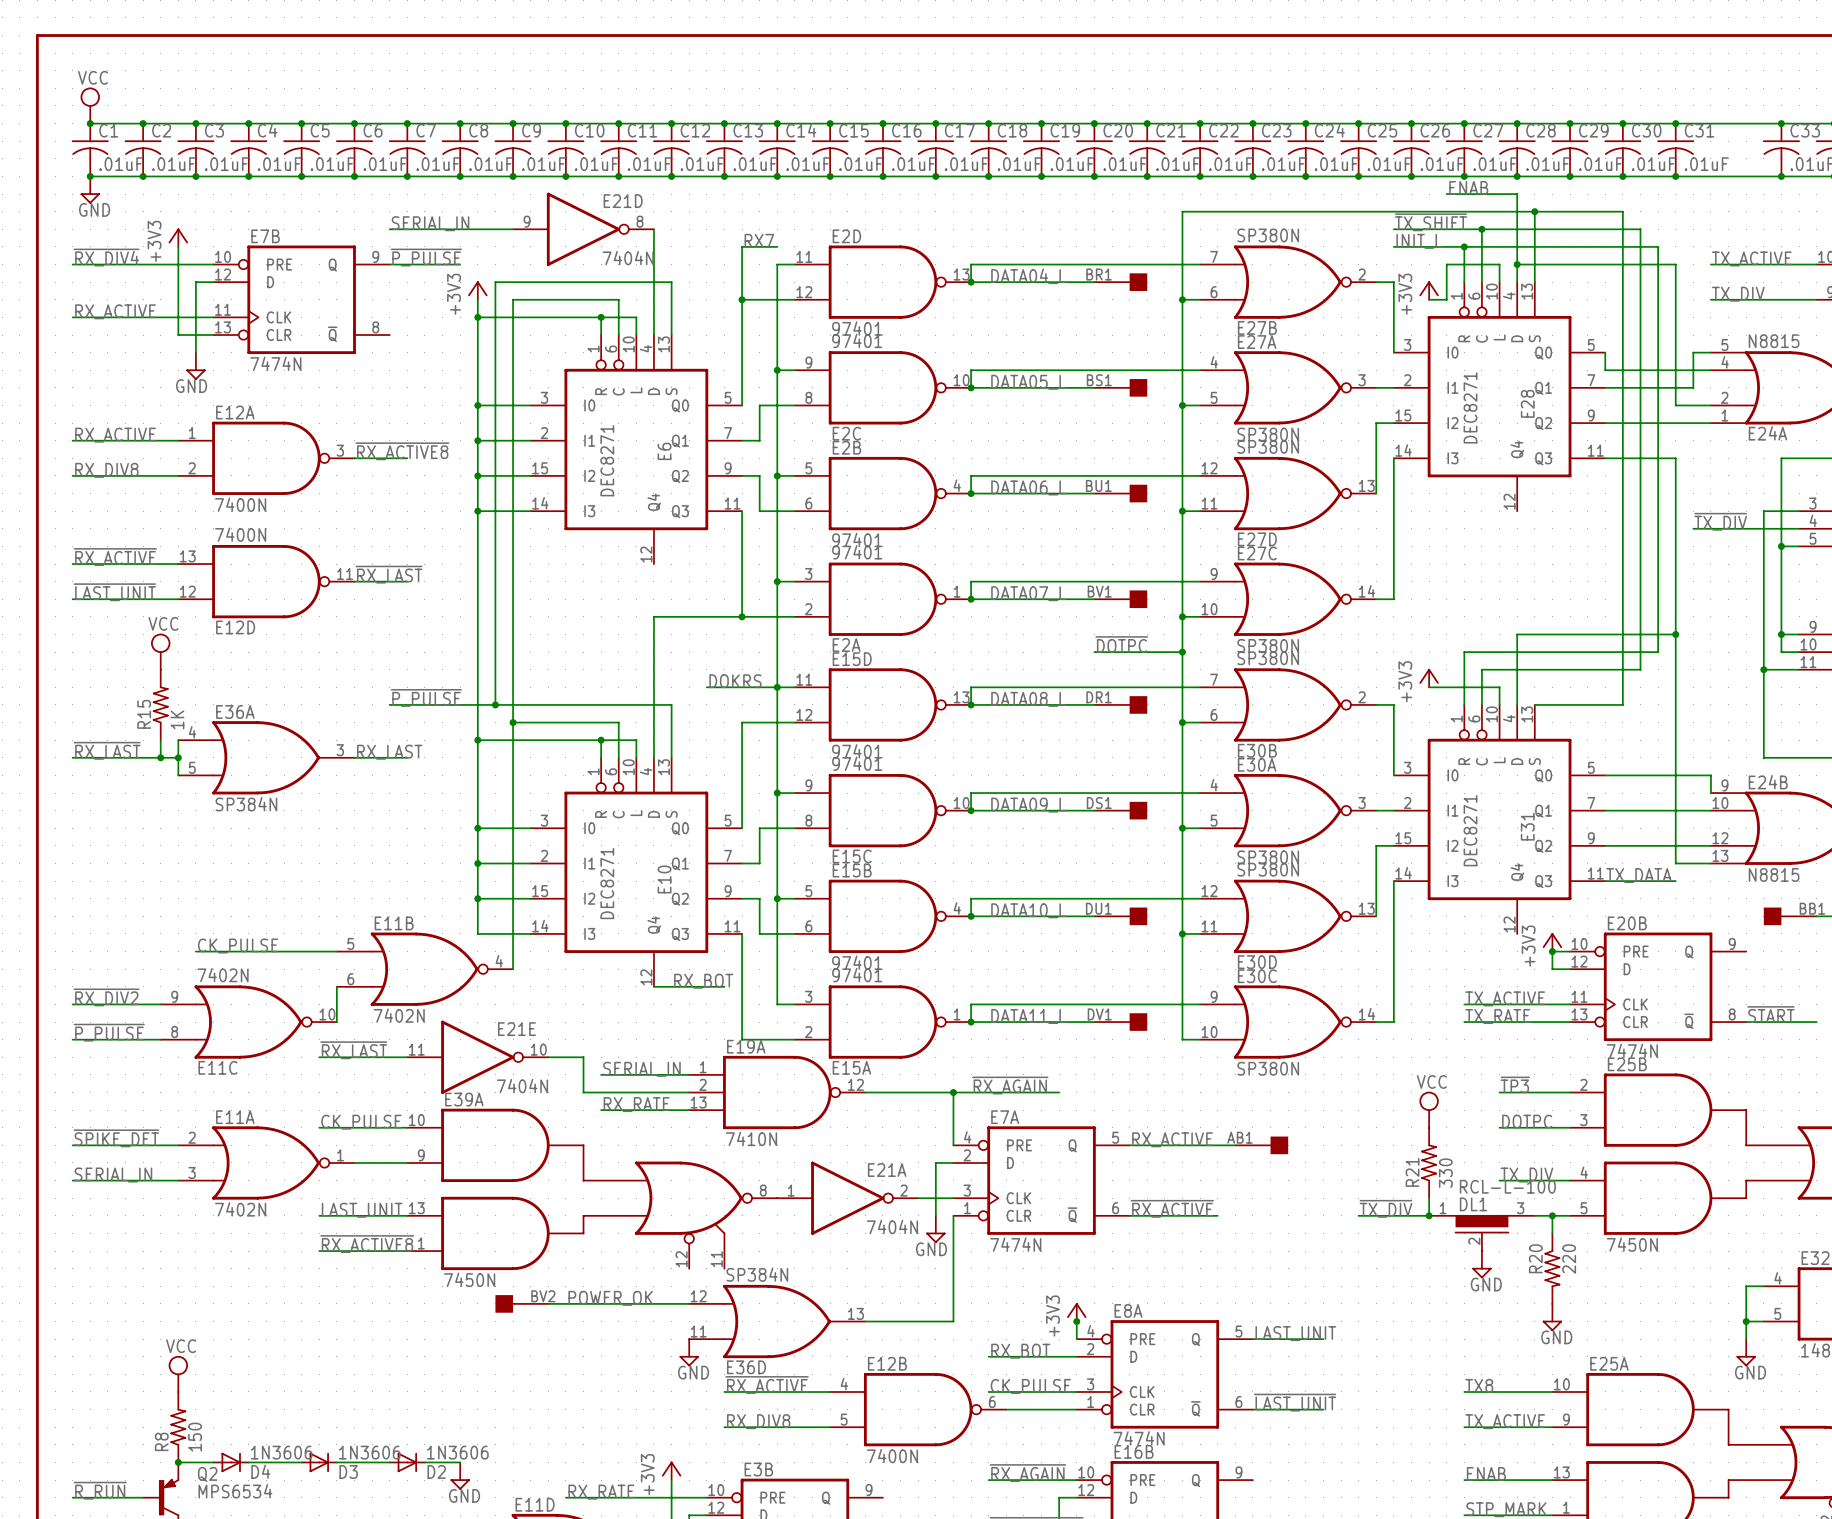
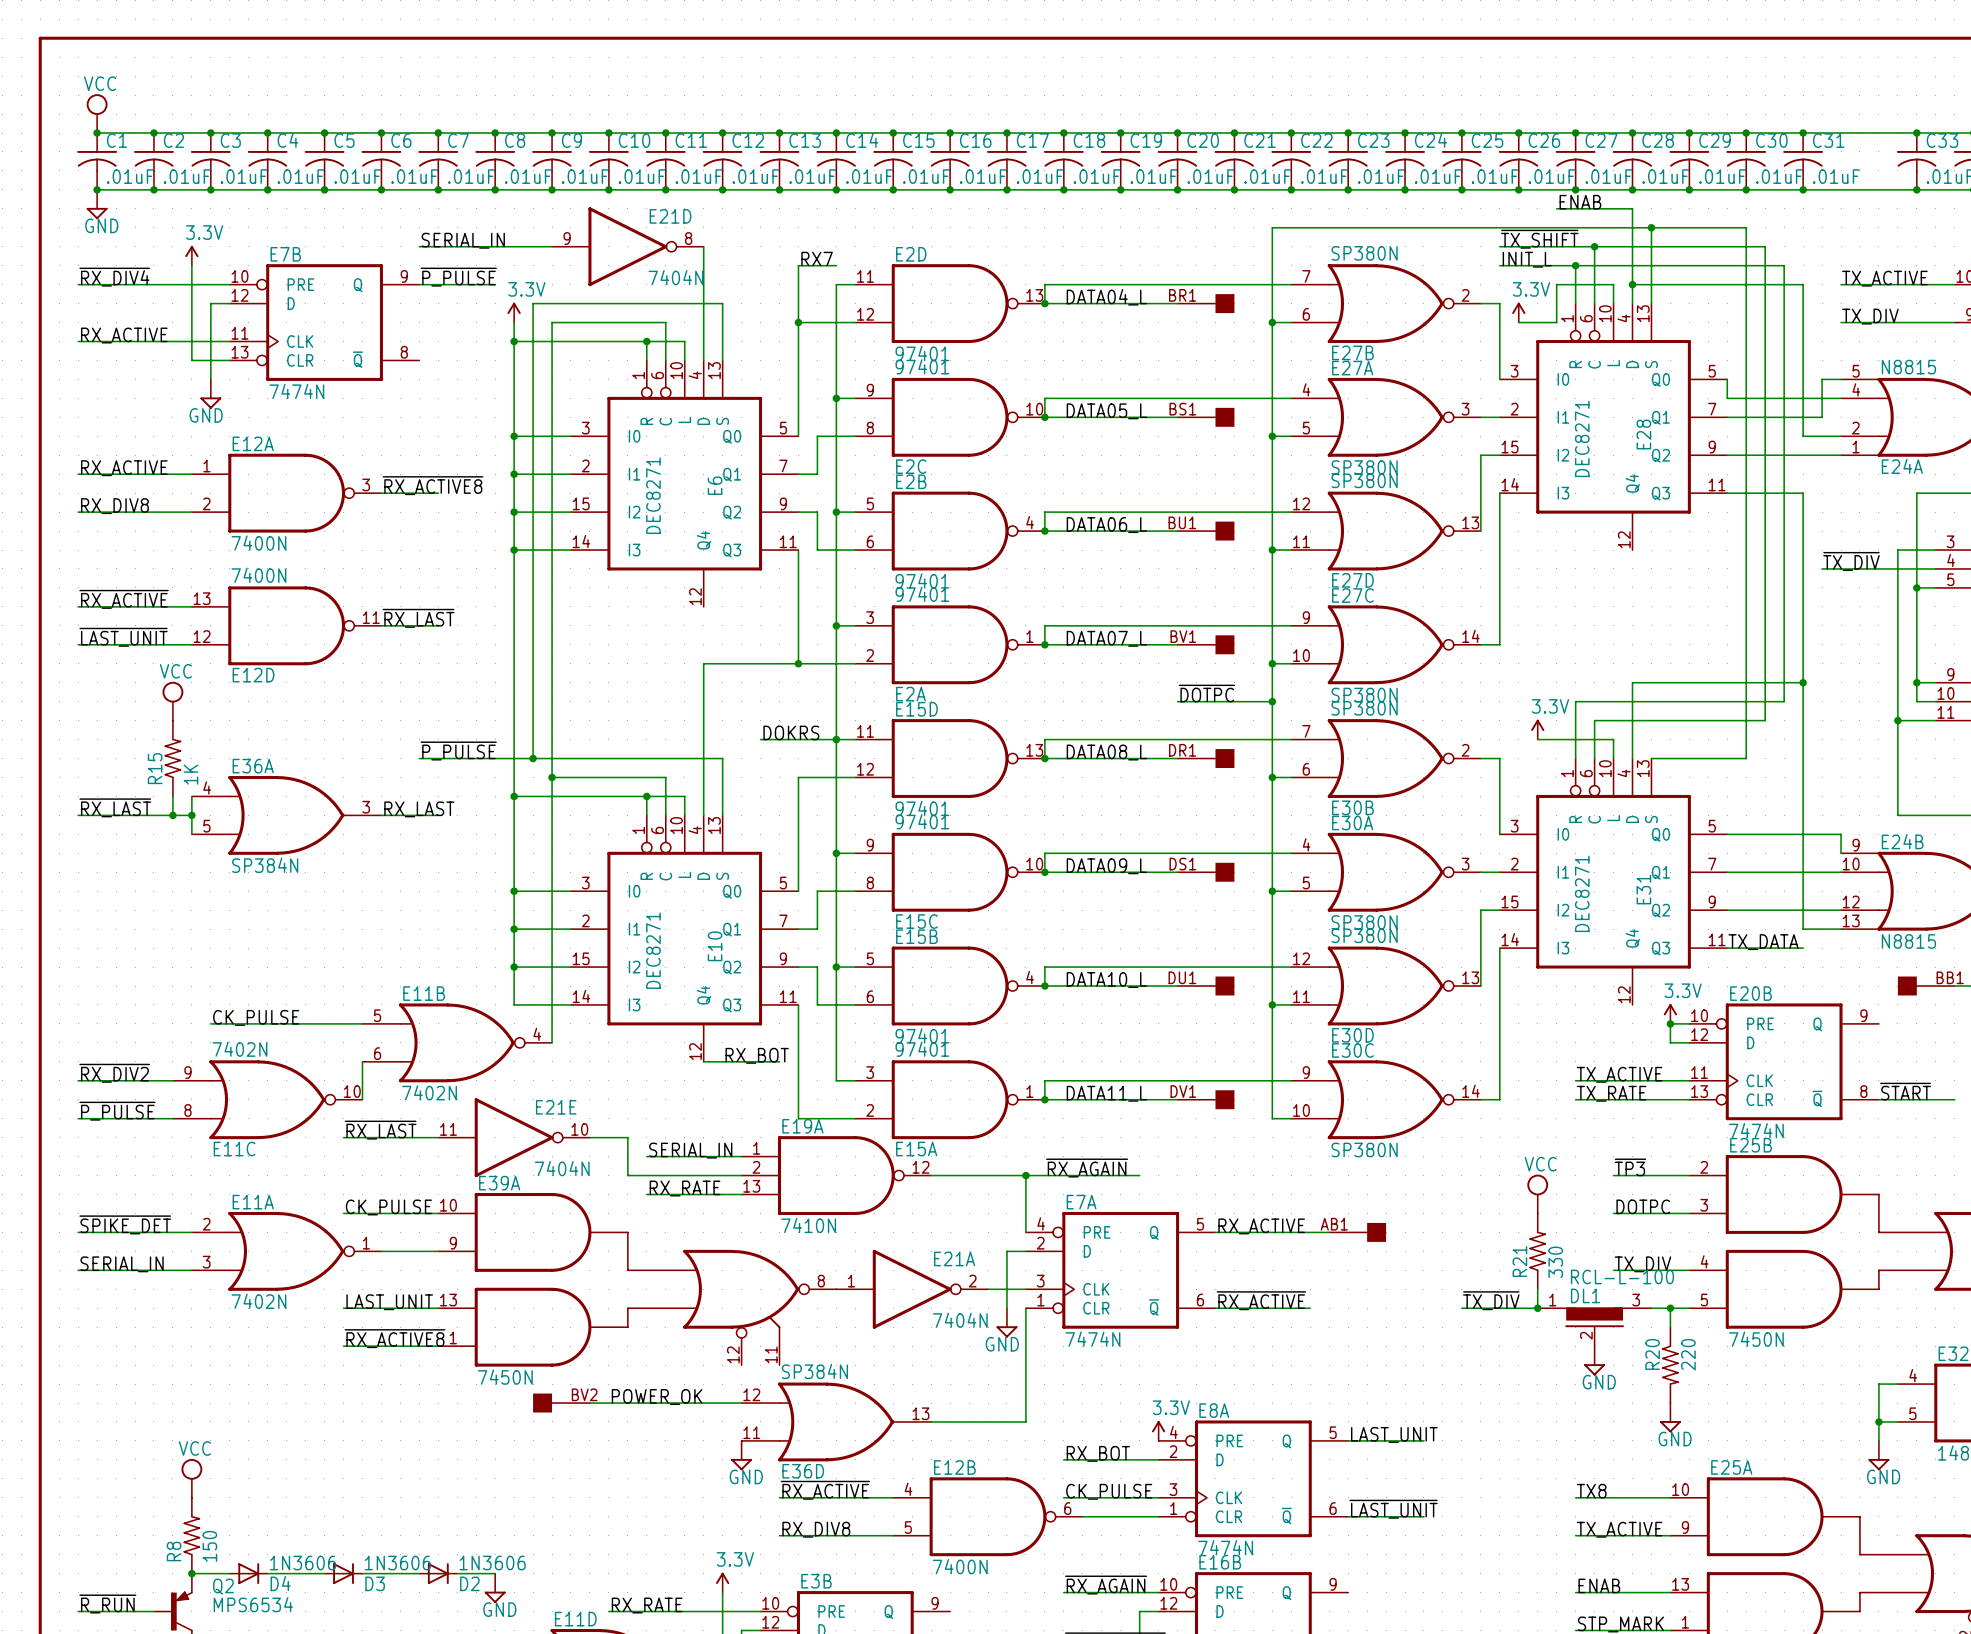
power symbol: +3V3 (178, 237) -> 3.3V (191, 255)
power symbol: +3V3 (477, 290) -> 3.3V (514, 312)
power symbol: none -> 3.3V (1518, 312)
power symbol: +3V3 (1429, 290) -> none
wire: none -> (1518, 322) (1537, 322)
power symbol: +3V3 (1429, 678) -> 3.3V (1537, 729)
power symbol: +3V3 (1552, 942) -> 3.3V (1670, 1013)
power symbol: +3V3 (1076, 1312) -> none
junction: (1076, 1321) -> none
power symbol: none -> 3.3V (1158, 1430)
power symbol: +3V3 (671, 1470) -> 3.3V (722, 1582)

